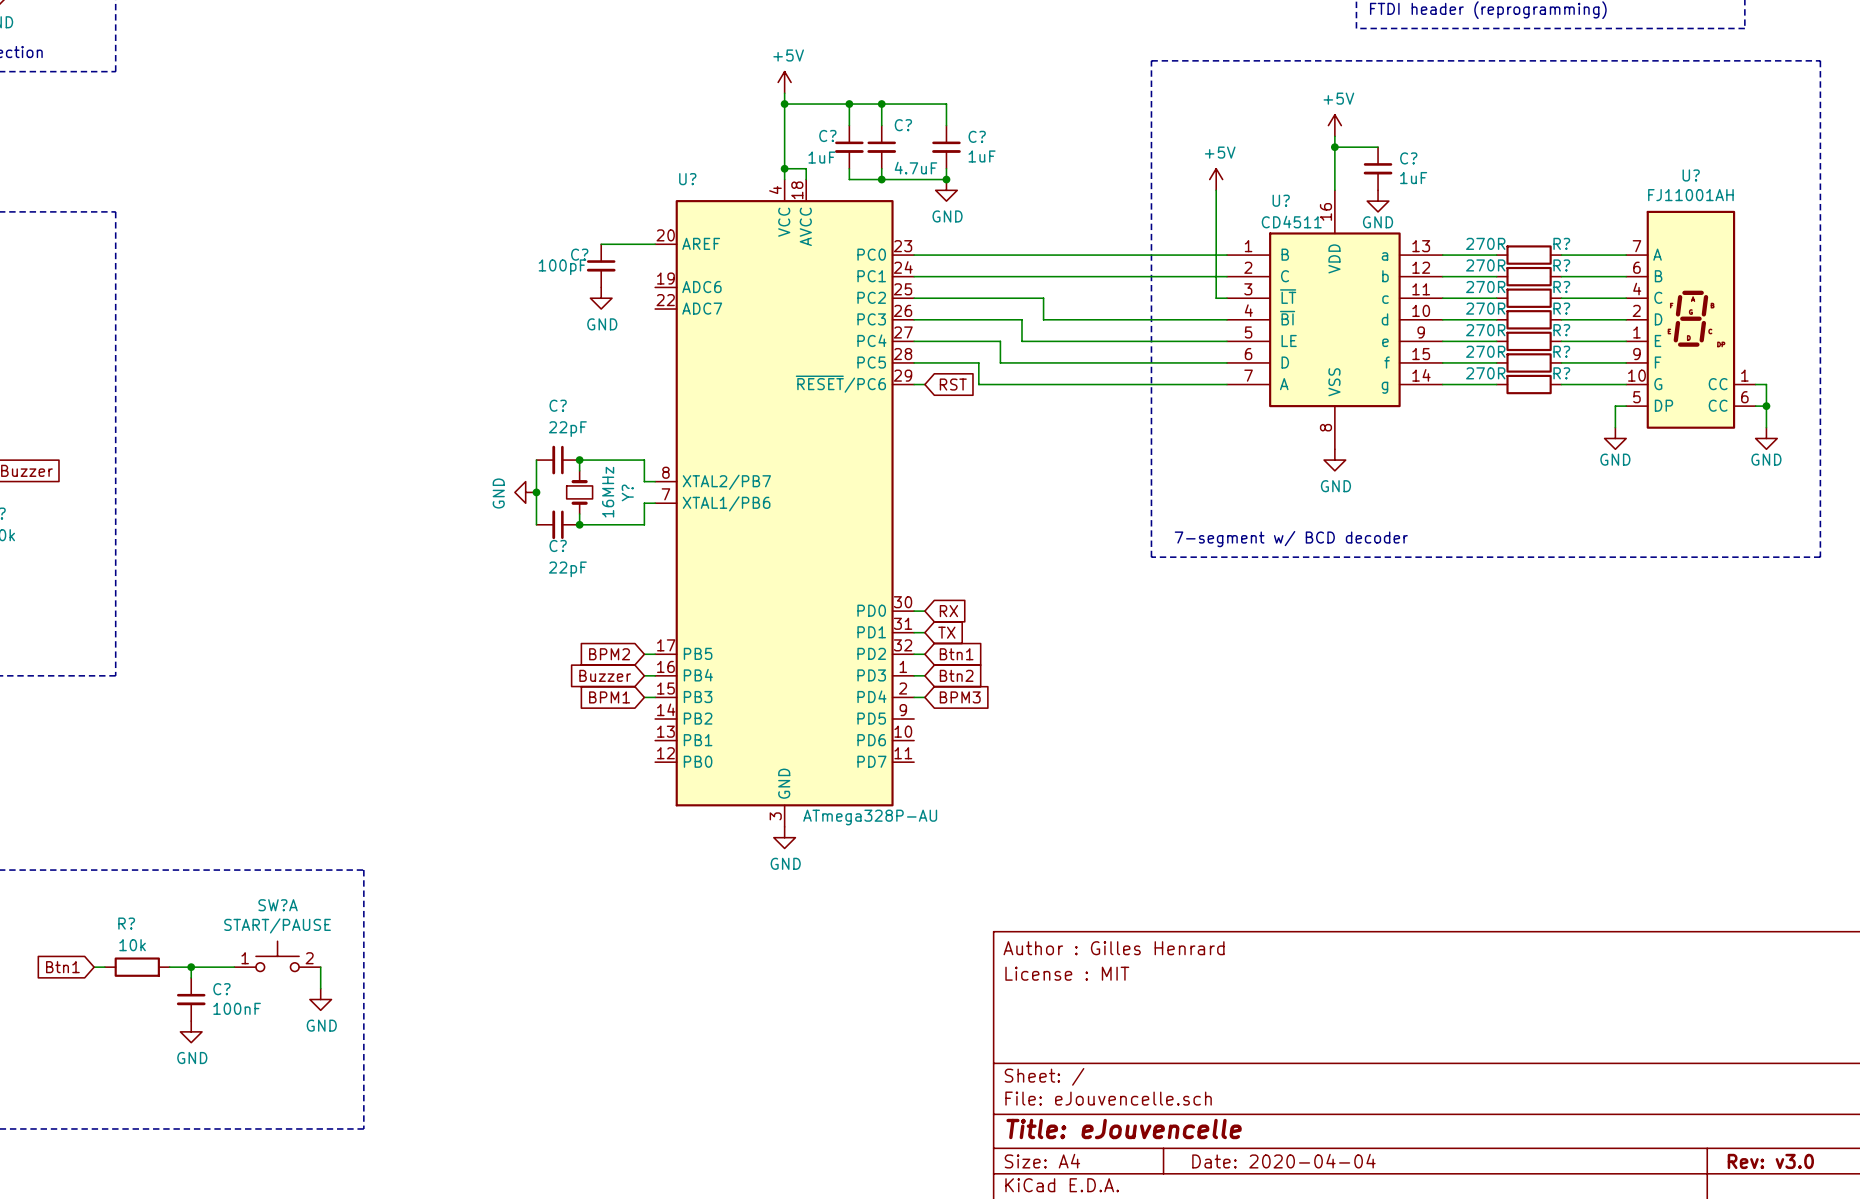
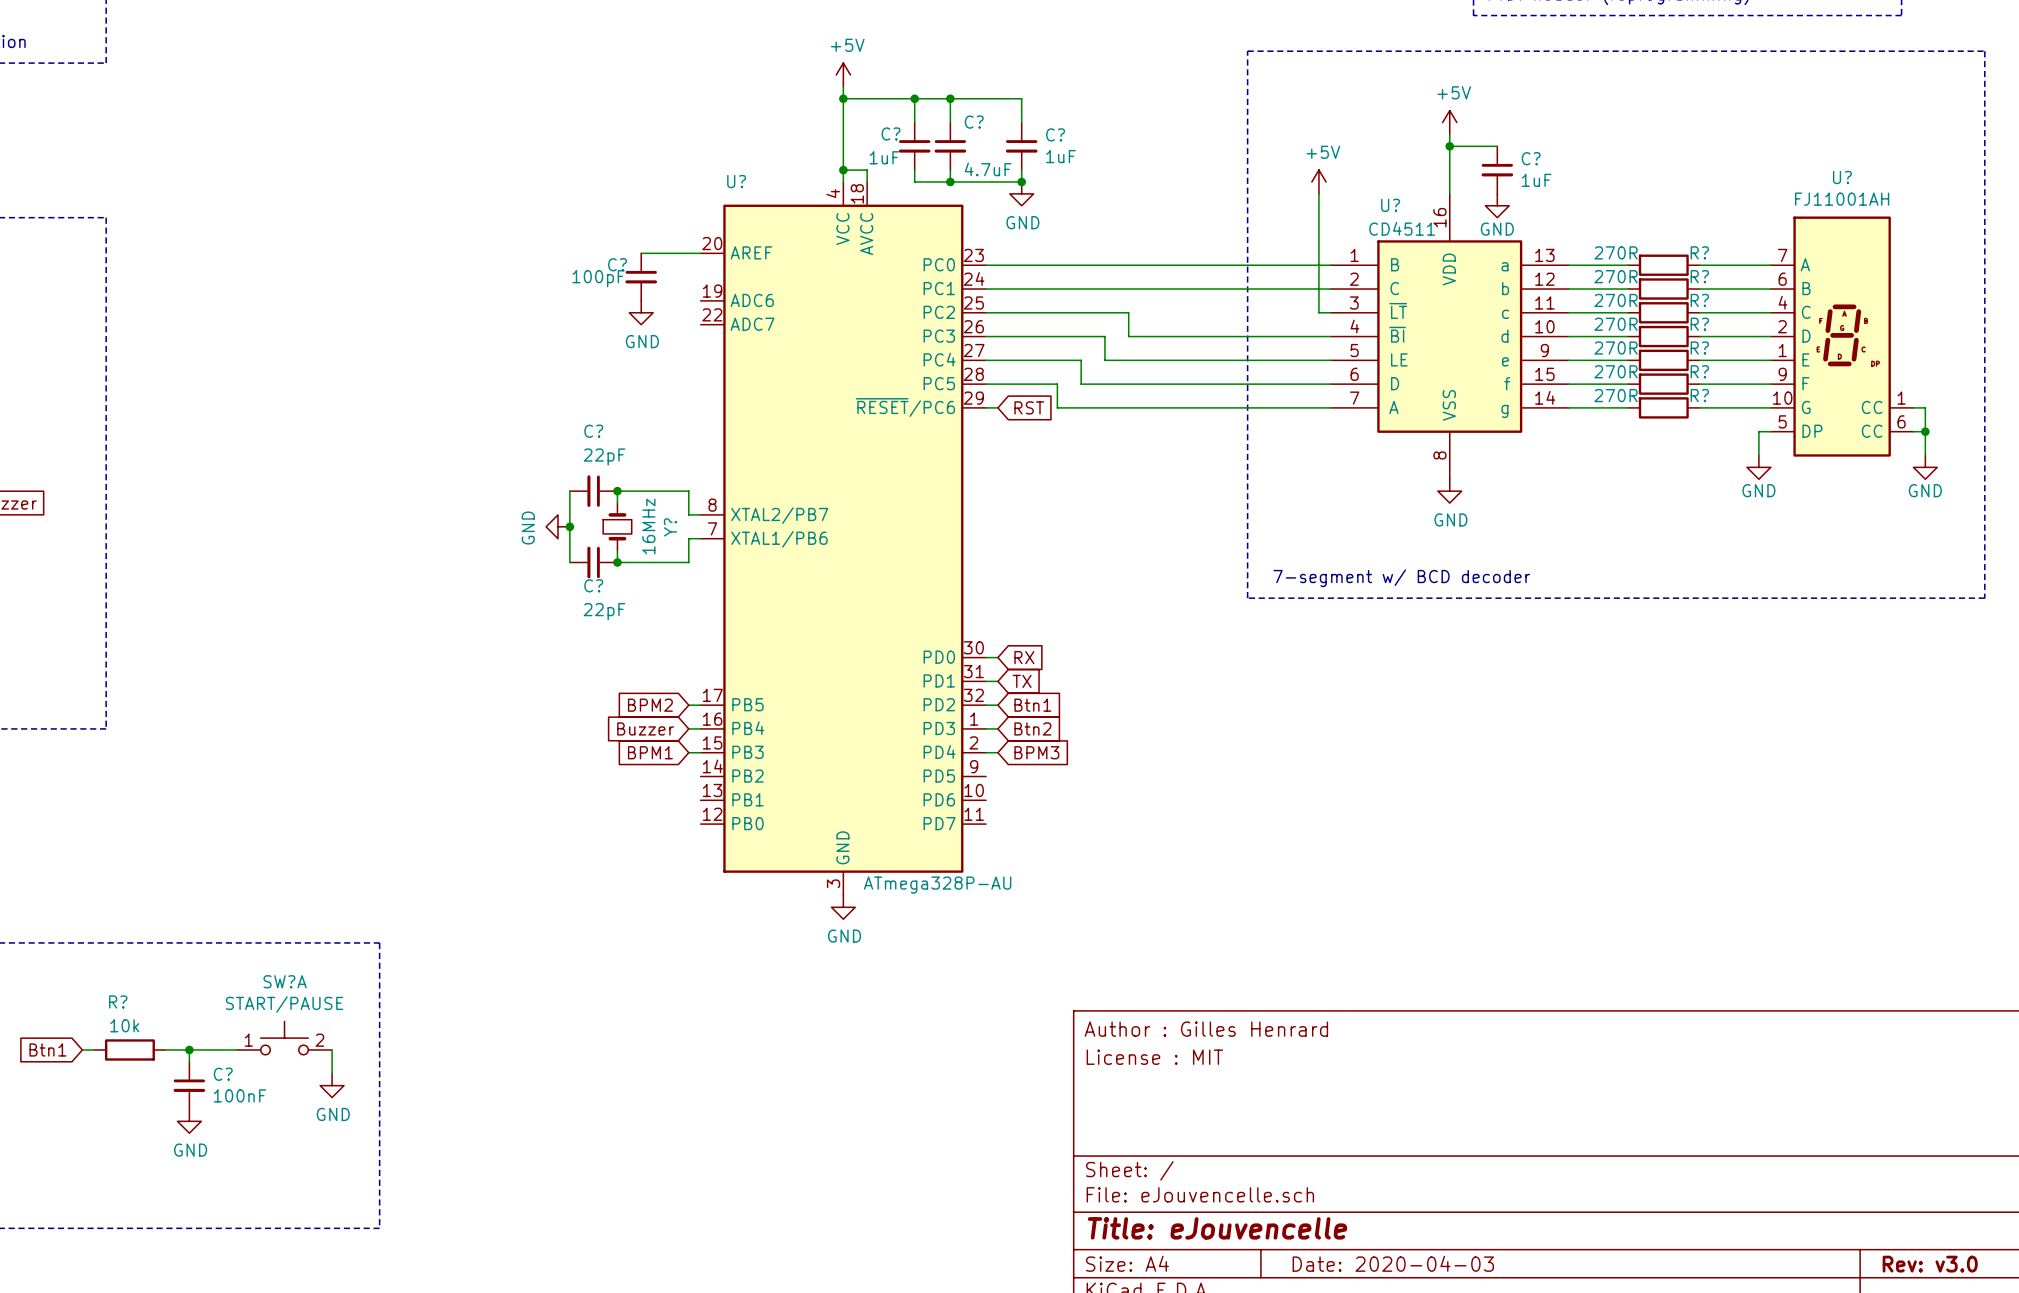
title block: Date: 2020-04-04 (1283, 1161) -> Date: 2020-04-03 (1393, 1263)

